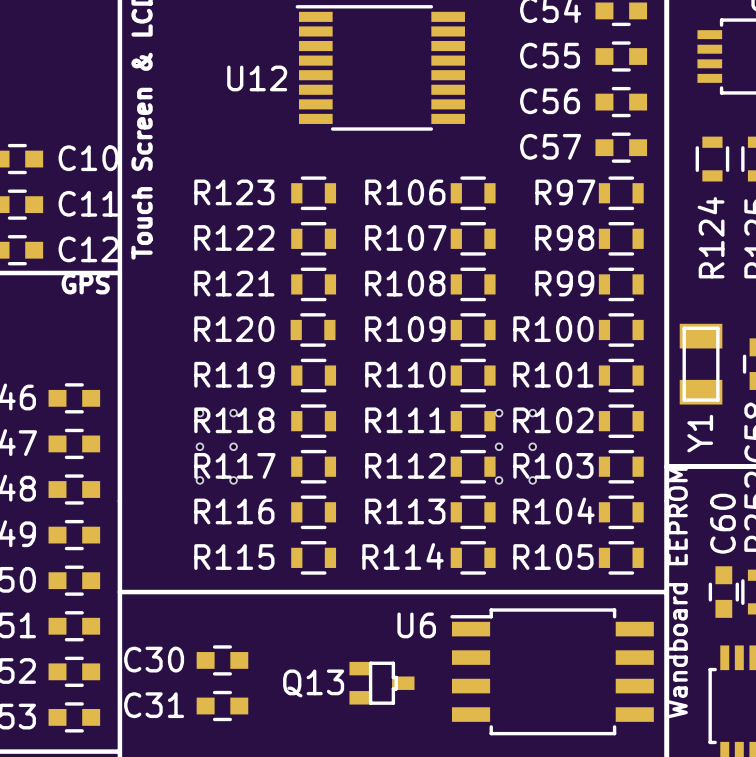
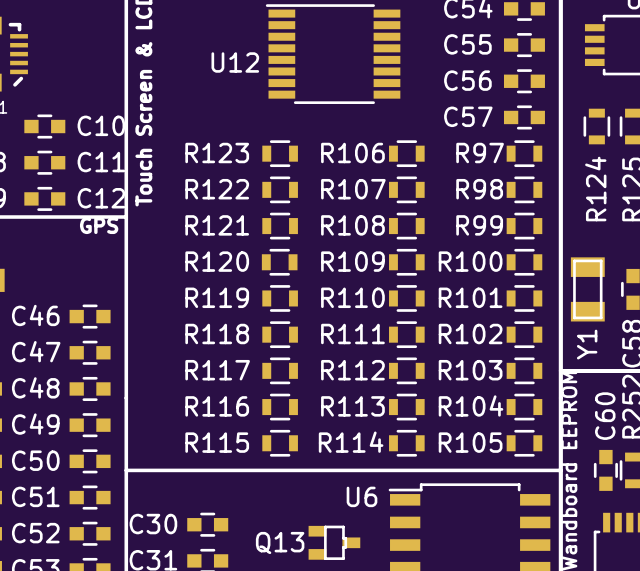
part: (216, 446) -> none
part: (515, 446) -> none

